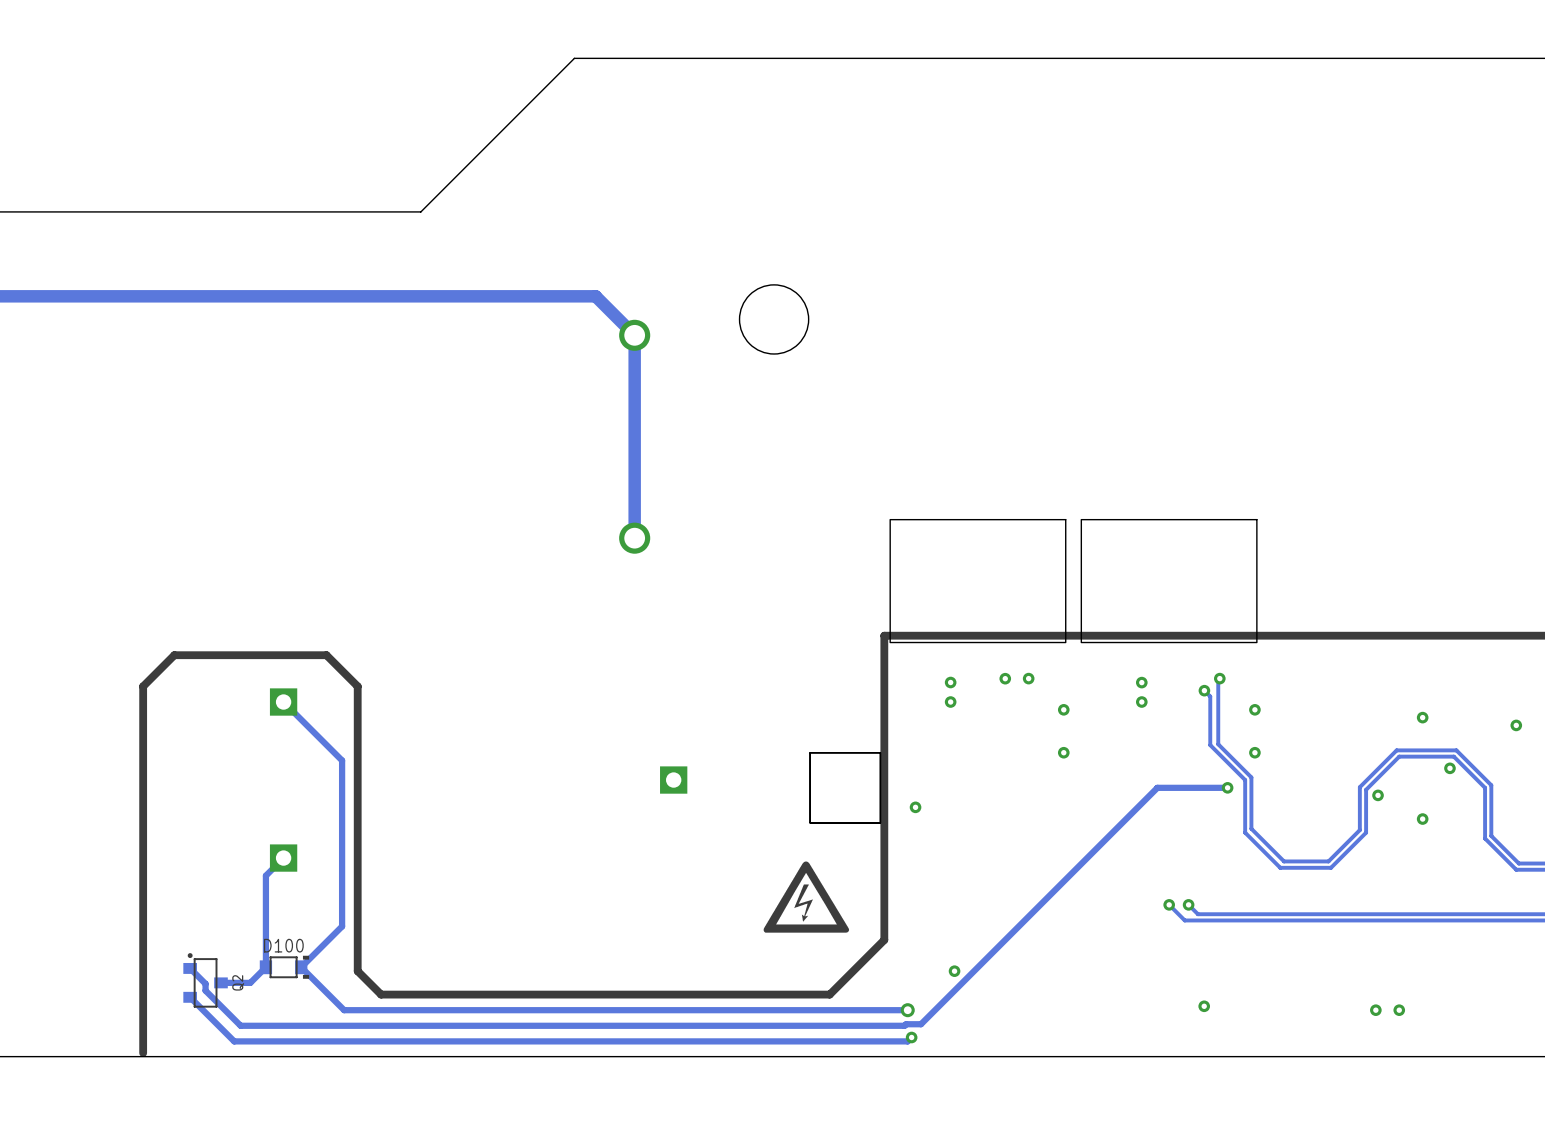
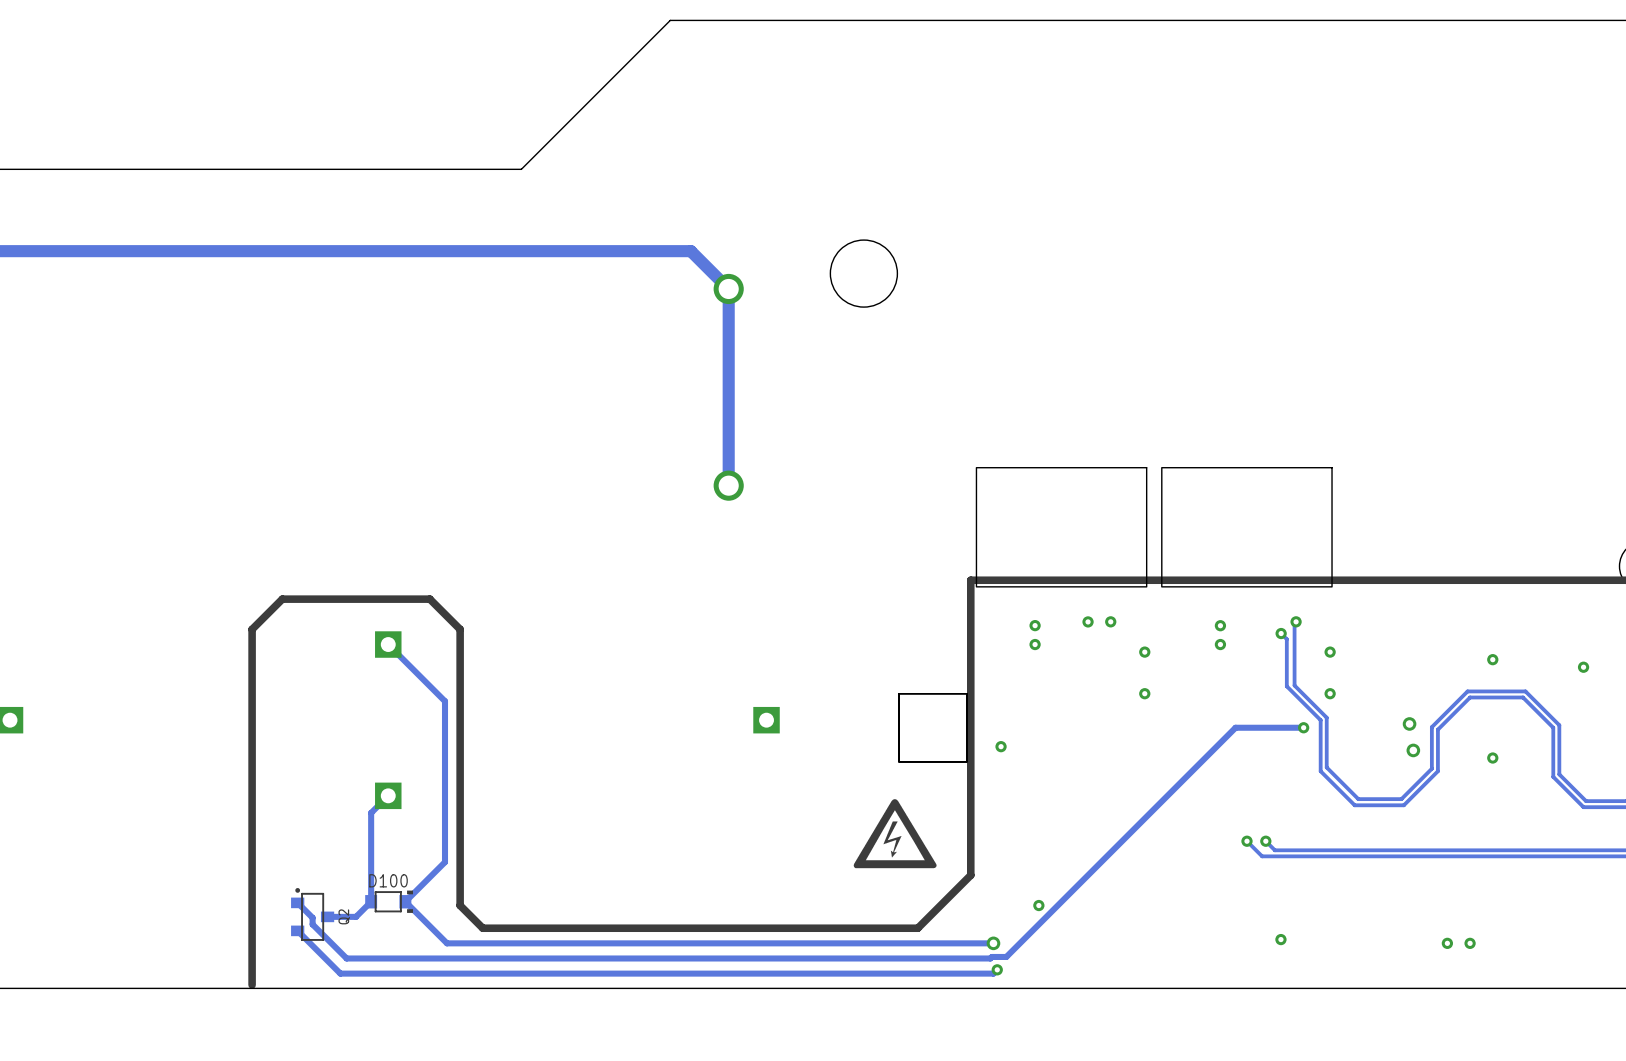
via: (1449, 768) -> none
via: none -> (1409, 723)
via: (1378, 795) -> none
via: none -> (1413, 750)

